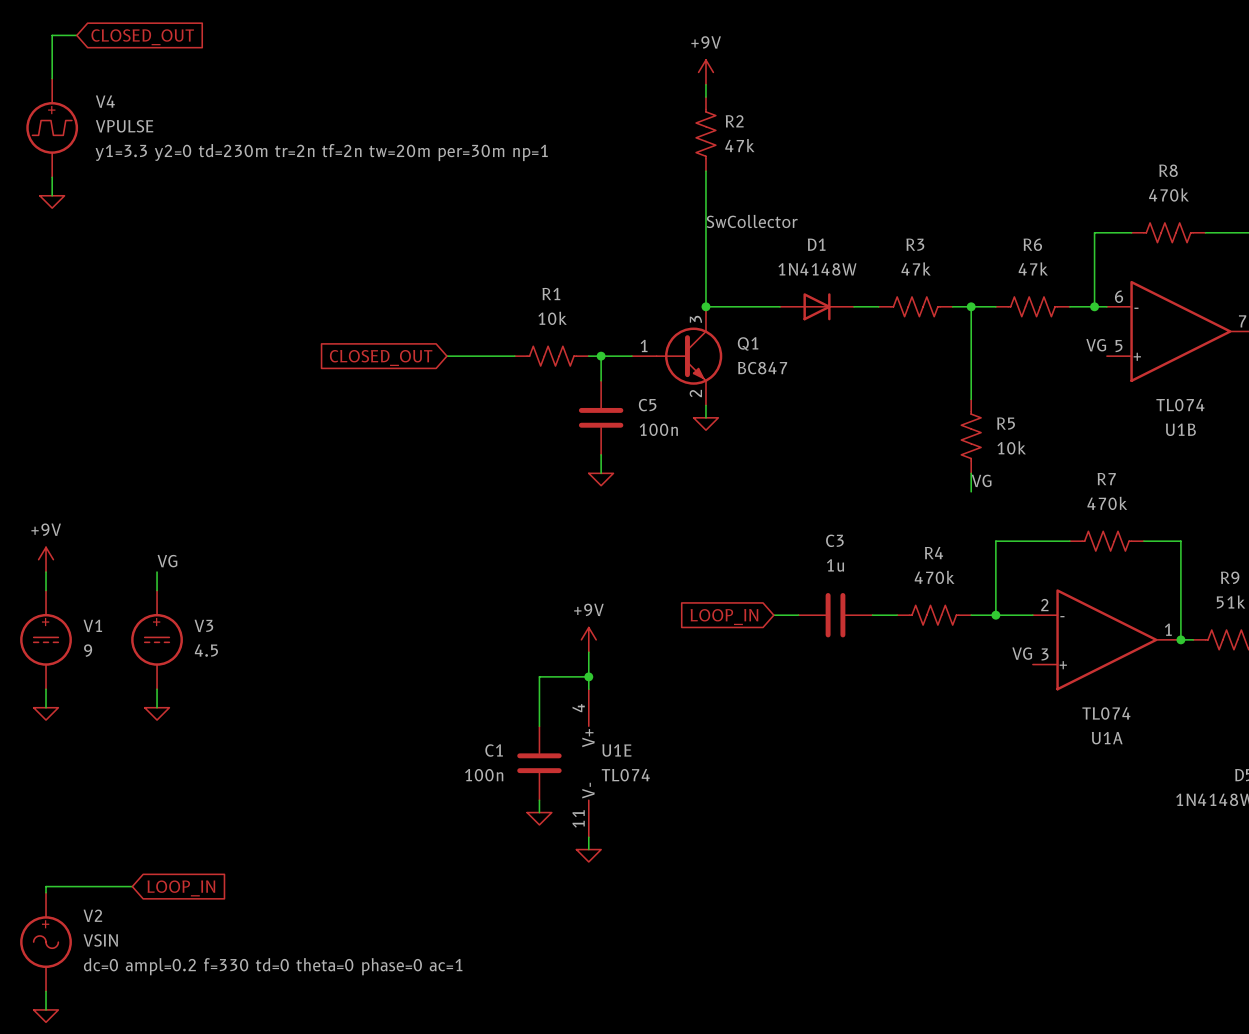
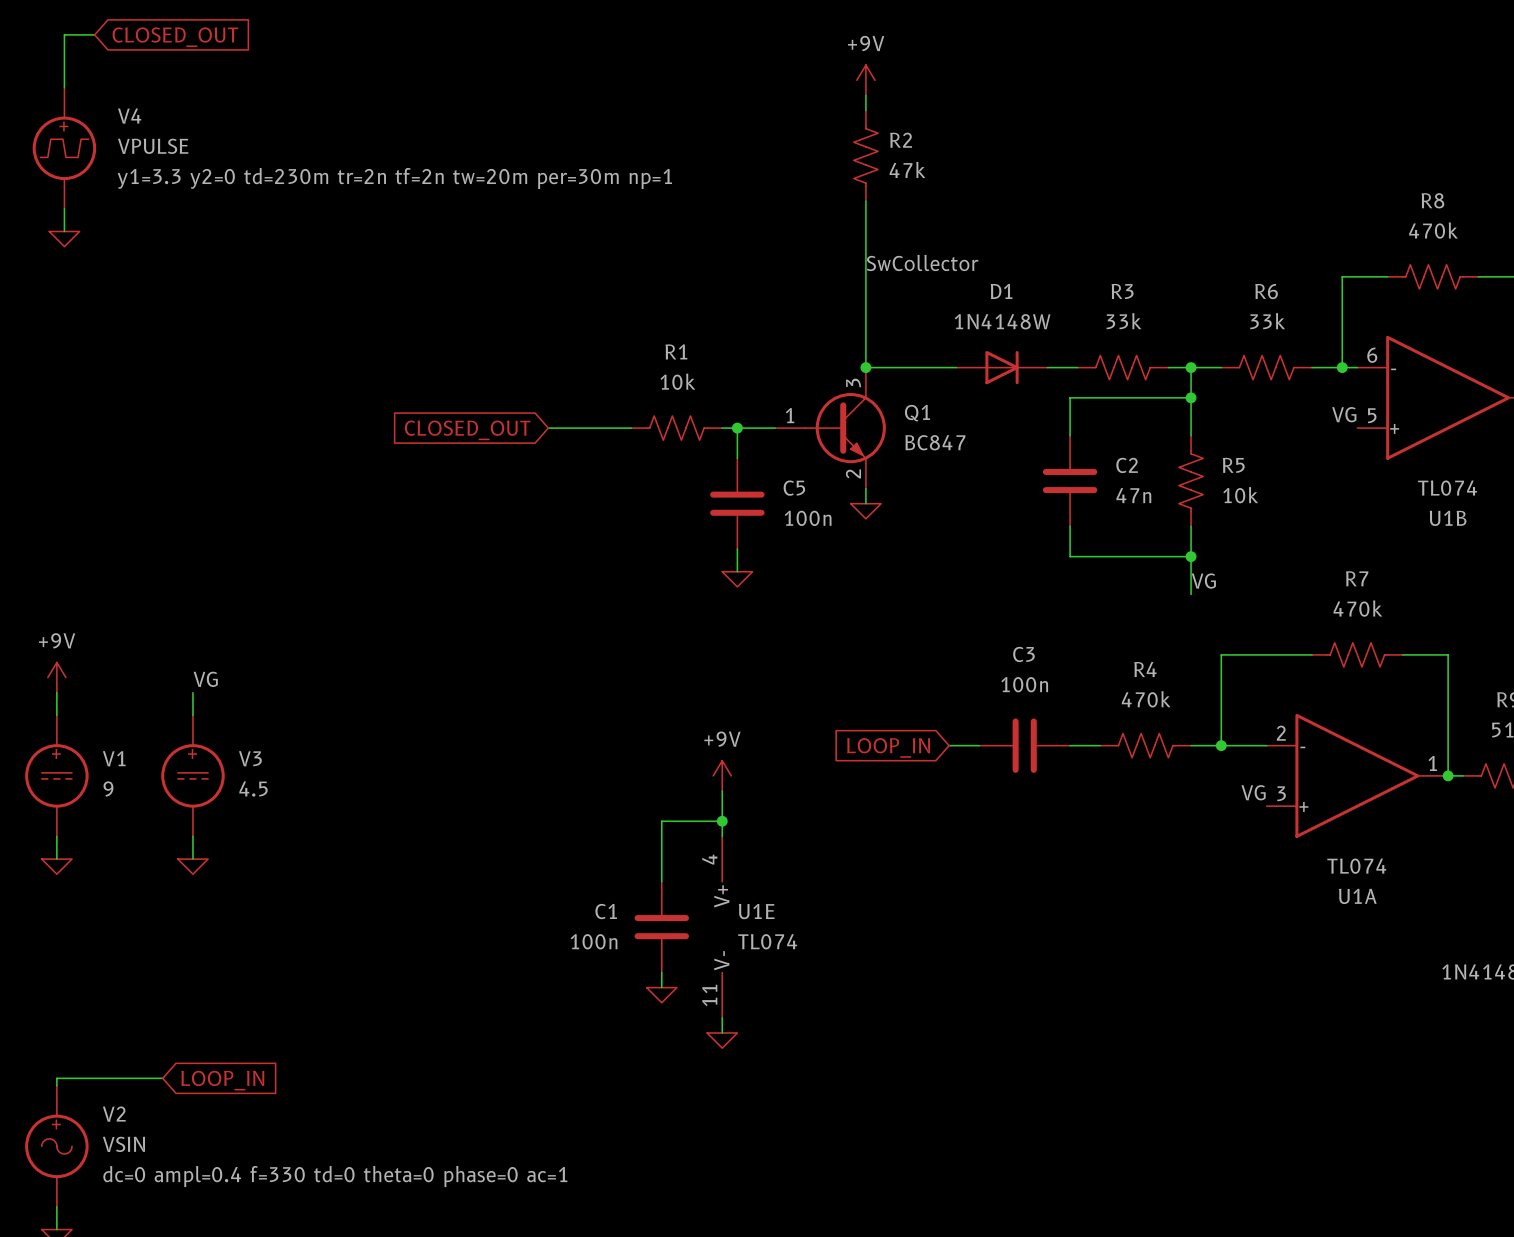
R3 value: 47k (916, 268) -> 33k (1123, 321)
R6 value: 47k (1033, 268) -> 33k (1267, 321)
wire: none -> (1191, 397) (1070, 397) (1070, 435)
junction: none -> (1191, 397)
C2: none -> 47n (1070, 481)
wire: none -> (1070, 526) (1070, 556) (1191, 556)
R5 position: (971, 436) -> (1191, 481)
junction: none -> (1191, 556)
C3 value: 1u (835, 565) -> 100n (1024, 684)
V2 text: dc=0 ampl=0.2 f=330 td=0 theta=0 phase=0 ac=1 (273, 966) -> dc=0 ampl=0.4 f=330 td=0 theta=0 phase=0 ac=1 (335, 1176)

